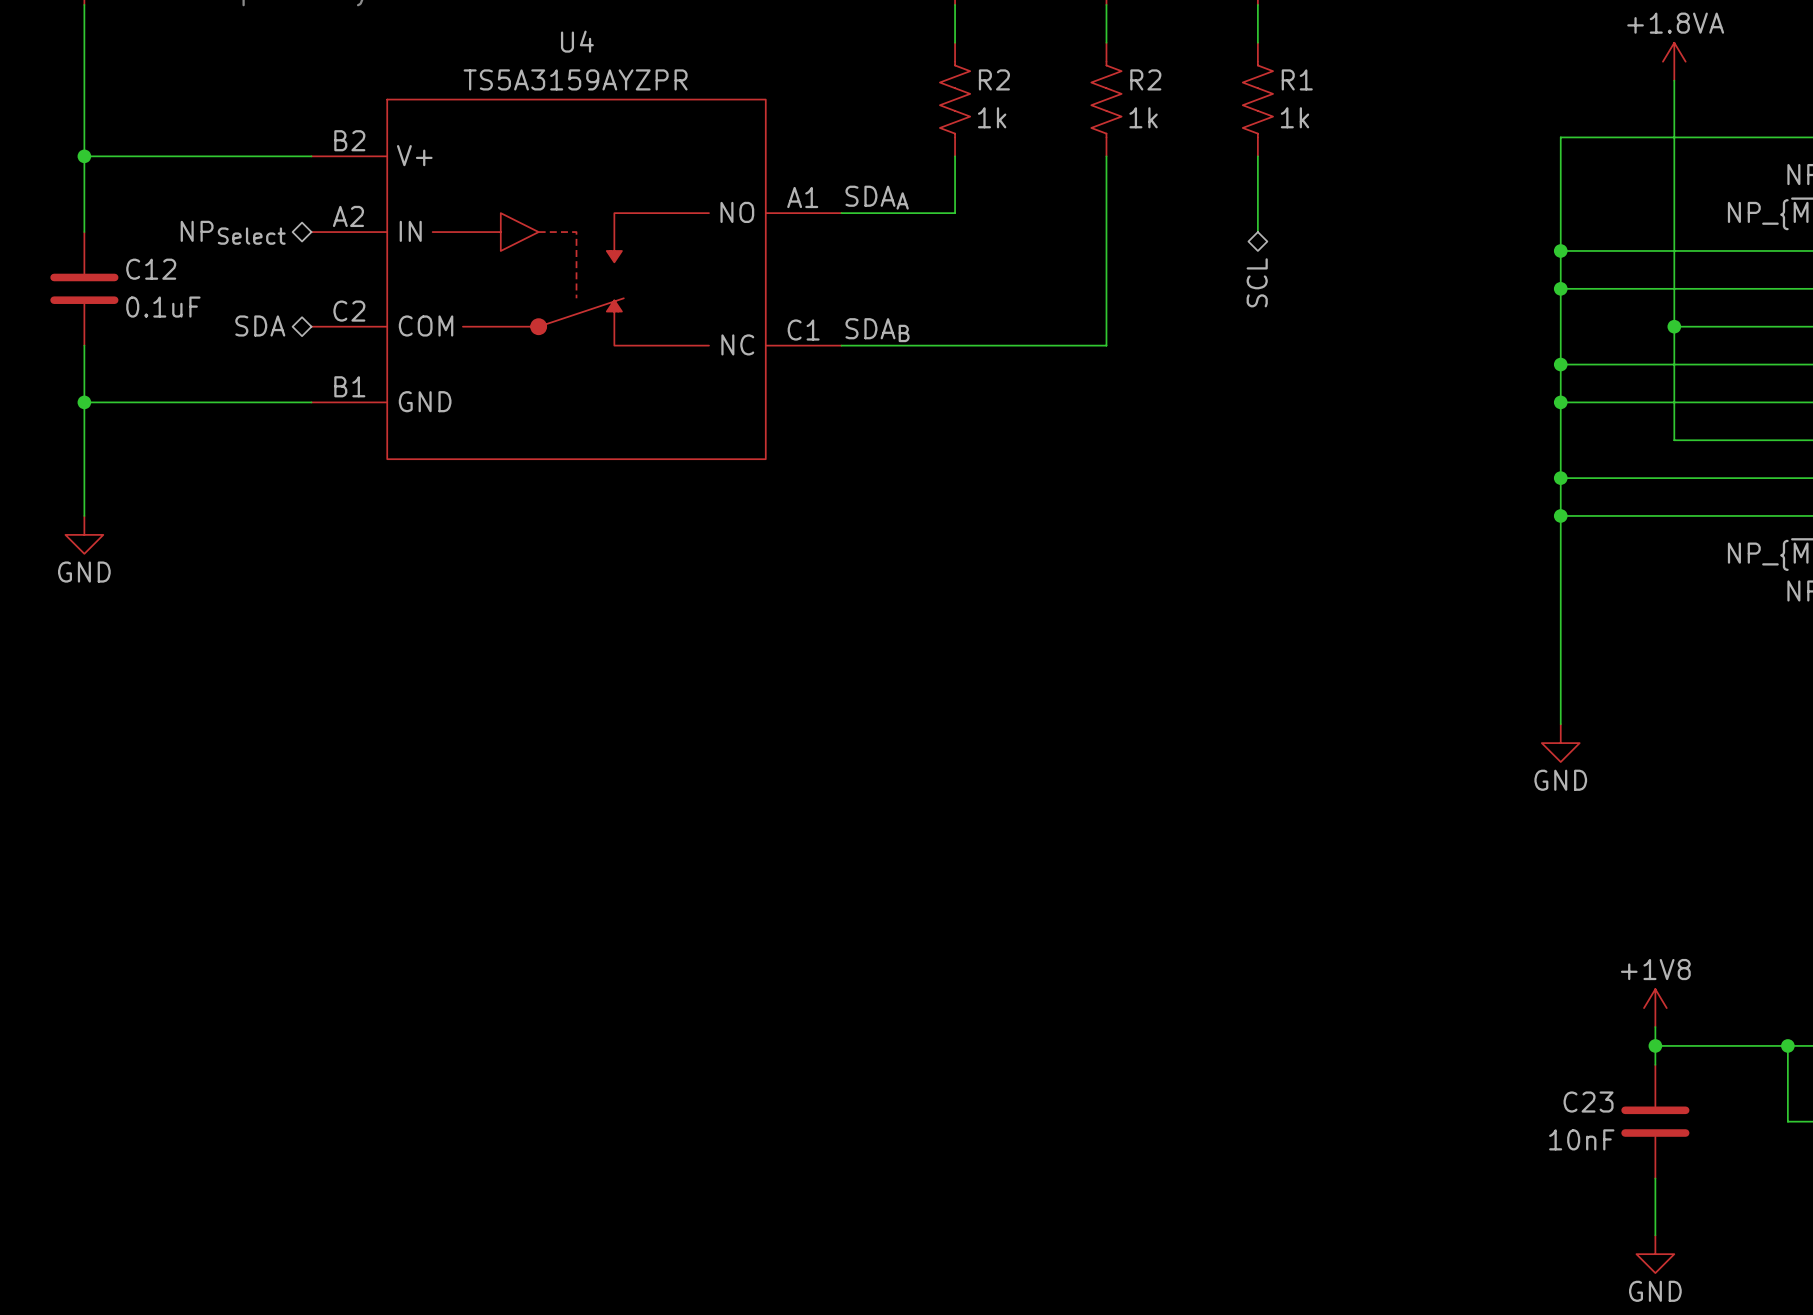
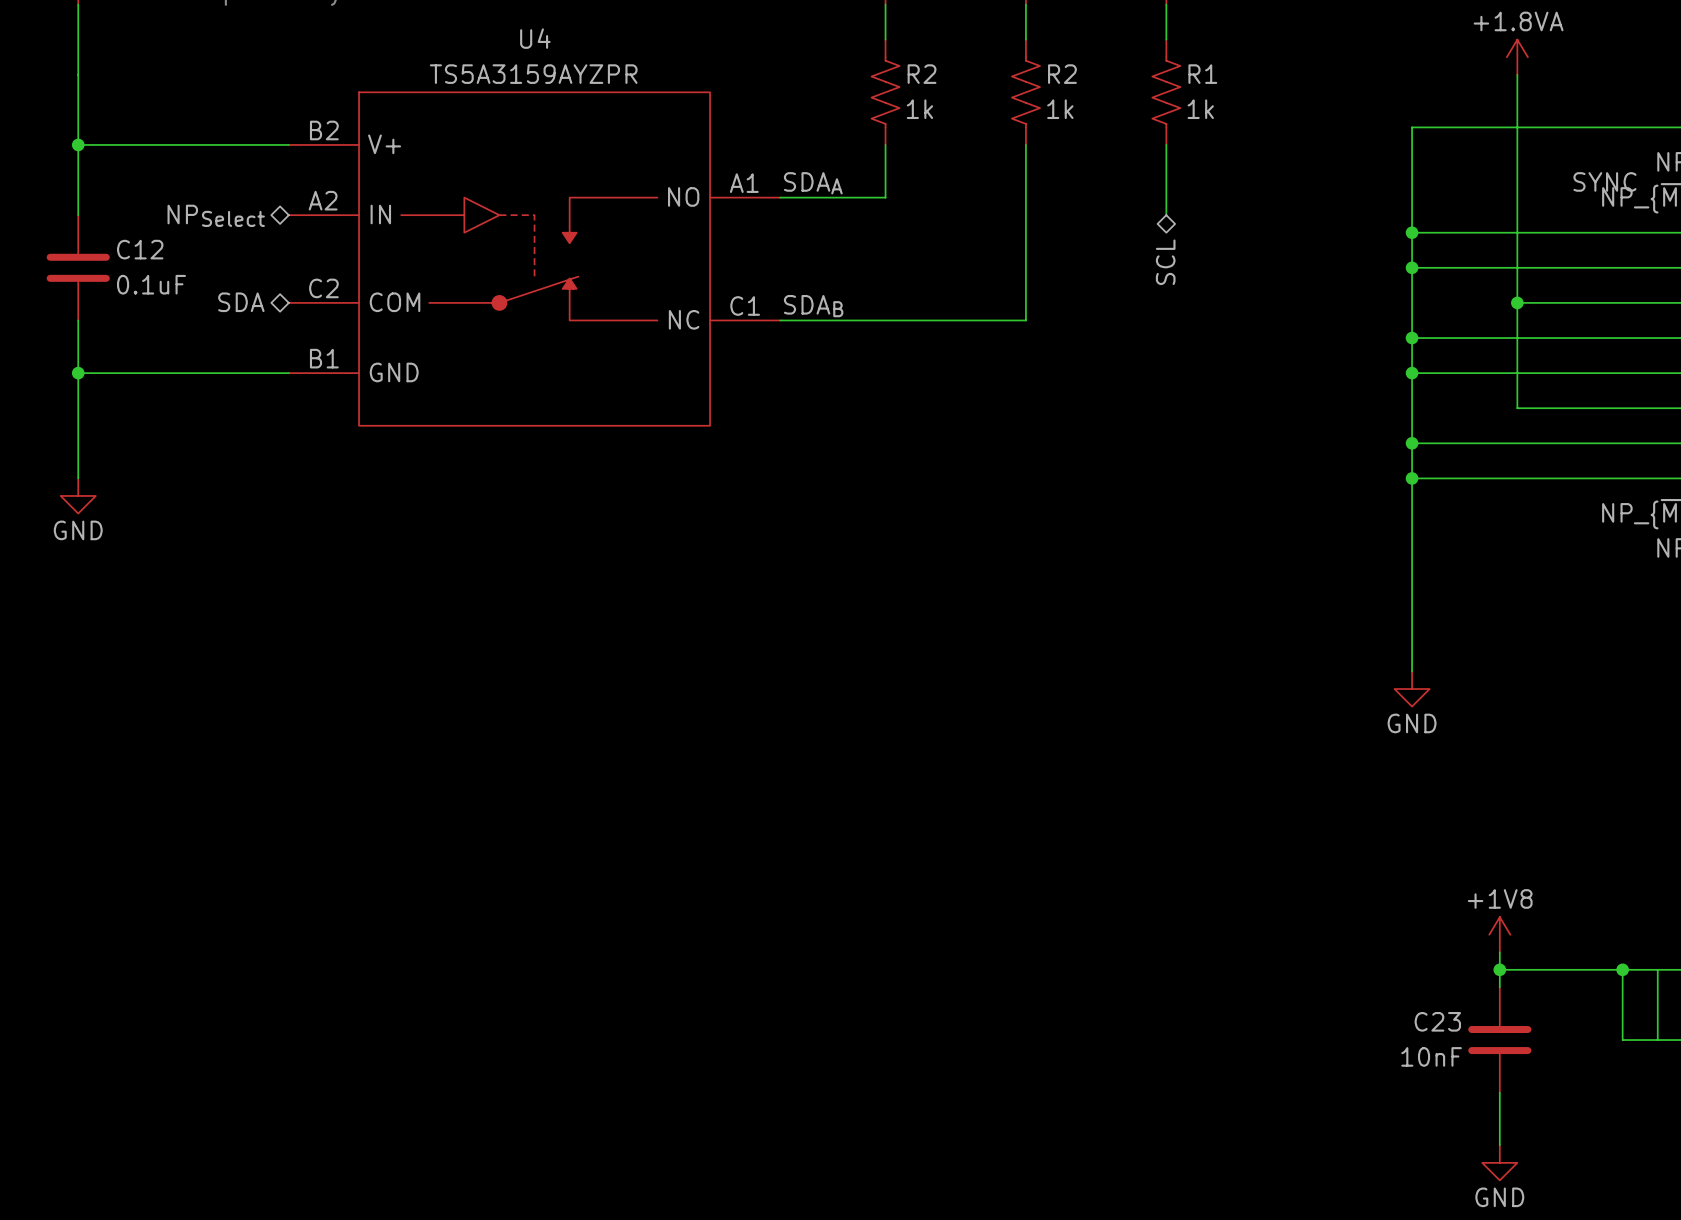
power symbol position: +1.8VA (1674, 61) -> +1.8VA (1517, 57)
wire: (1674, 80) (1674, 440) -> (1517, 74) (1517, 408) (1552, 408)
wire: (1560, 137) (1560, 724) -> (1447, 127) (1412, 127) (1412, 671)
label: none -> SYNC (1604, 181)
wire: none -> (1412, 232) (1447, 232)
junction: none -> (1412, 232)
junction: (1560, 250) -> none
wire: none -> (1412, 267) (1447, 267)
junction: none -> (1412, 267)
junction: (1560, 288) -> none
wire: none -> (1517, 302) (1552, 302)
junction position: (1674, 326) -> (1517, 302)
wire: none -> (1412, 338) (1447, 338)
junction: none -> (1412, 338)
junction: (1560, 364) -> none
wire: none -> (1412, 373) (1447, 373)
junction: none -> (1412, 373)
junction: (1560, 402) -> none
wire: none -> (1412, 443) (1447, 443)
junction: none -> (1412, 443)
junction: (1560, 478) -> none
wire: none -> (1412, 478) (1447, 478)
junction: none -> (1412, 478)
junction: (1560, 515) -> none
power symbol position: GND (1560, 743) -> GND (1412, 689)
power symbol position: +1V8 (1655, 1008) -> +1V8 (1499, 934)
wire: (1655, 1027) (1655, 1064) -> (1499, 952) (1499, 987)
wire: none -> (1499, 969) (1534, 969)
junction position: (1655, 1045) -> (1499, 969)
wire: none -> (1622, 969) (1622, 1040) (1657, 1040)
junction position: (1787, 1045) -> (1622, 969)
C23 position: (1655, 1121) -> (1499, 1040)
wire: (1655, 1178) (1655, 1235) -> (1499, 1092) (1499, 1145)
power symbol position: GND (1655, 1254) -> GND (1499, 1162)

